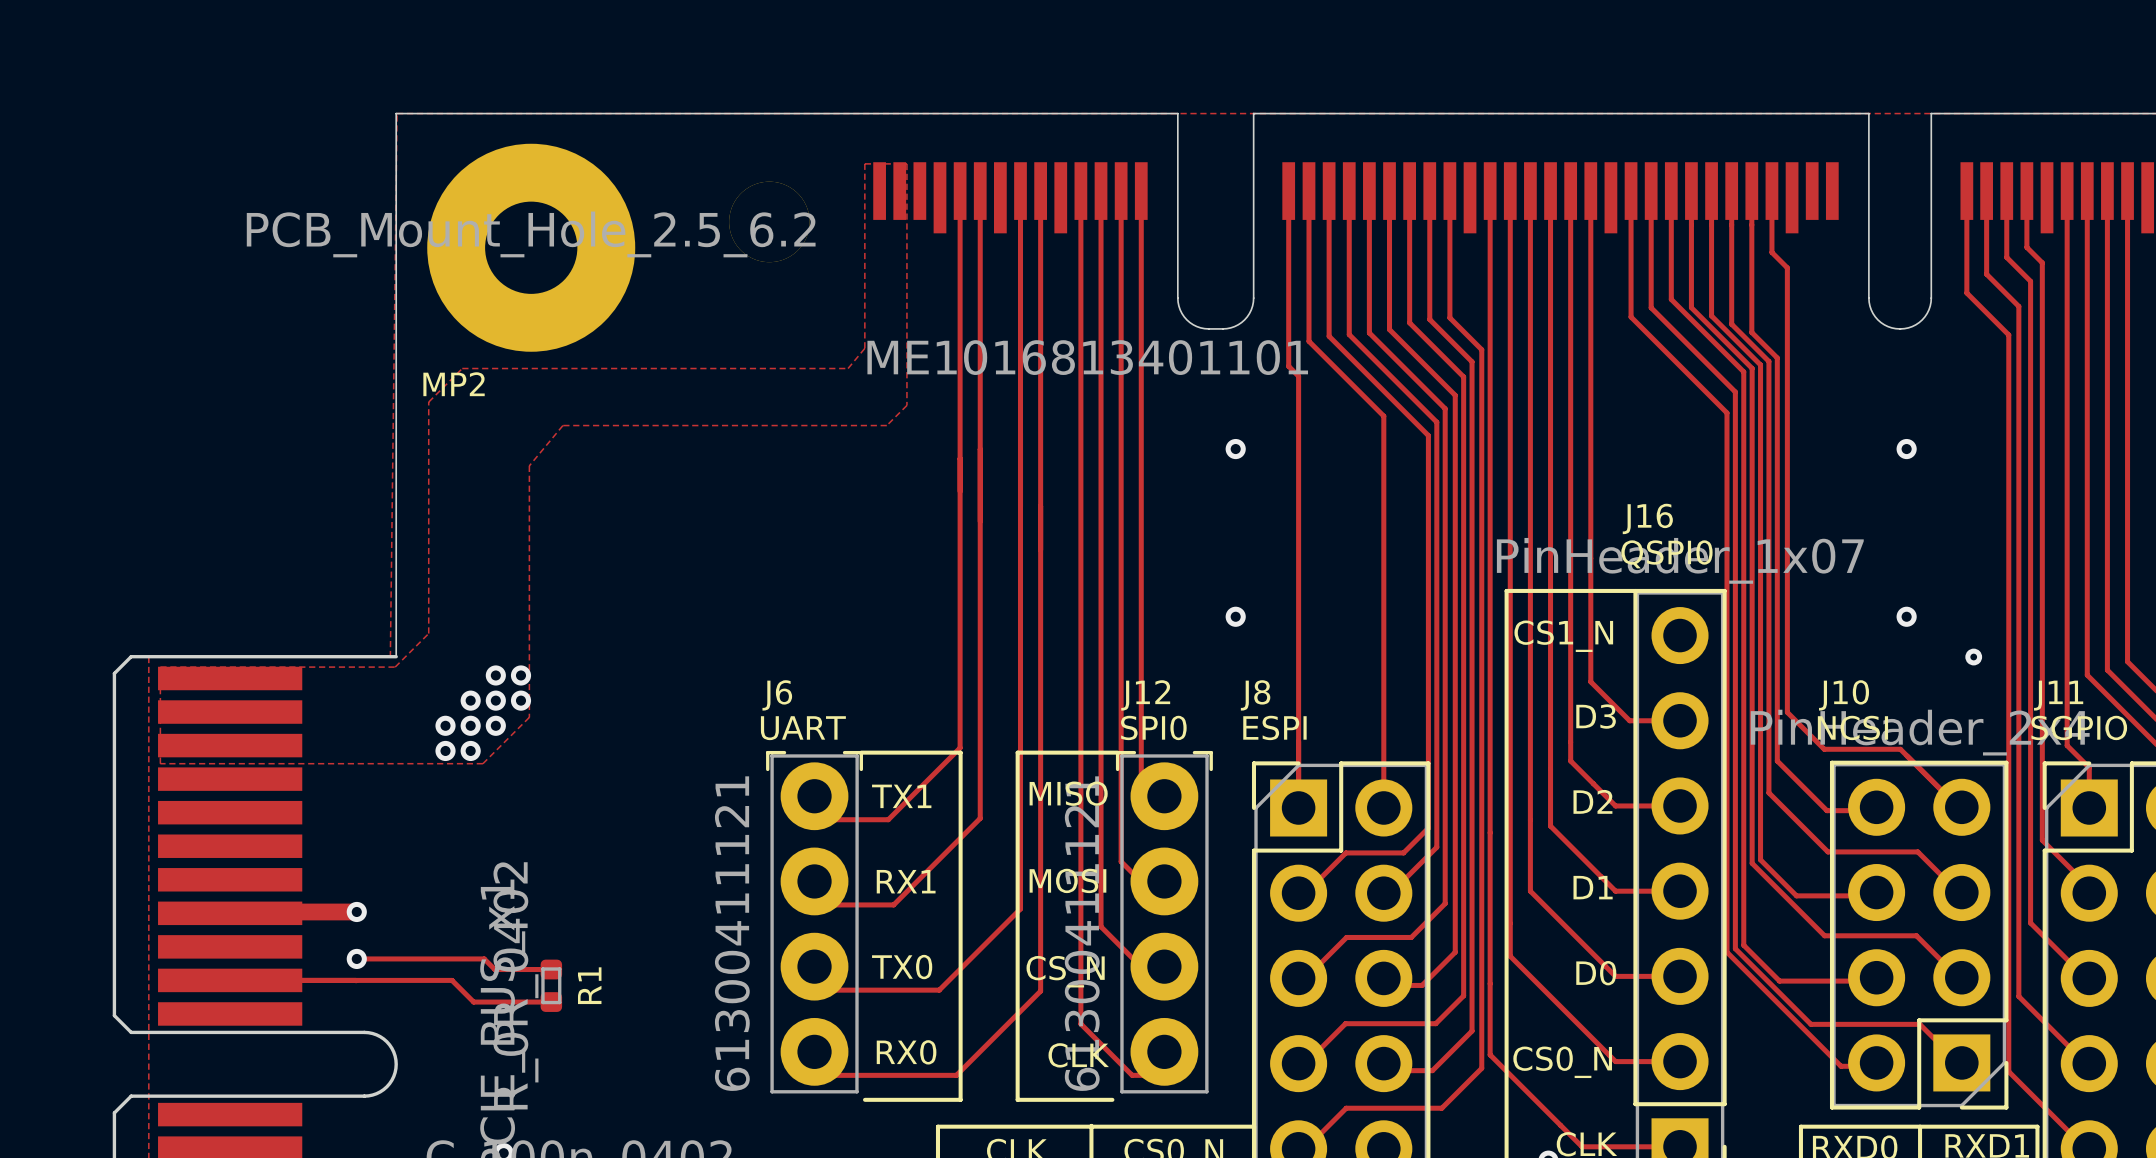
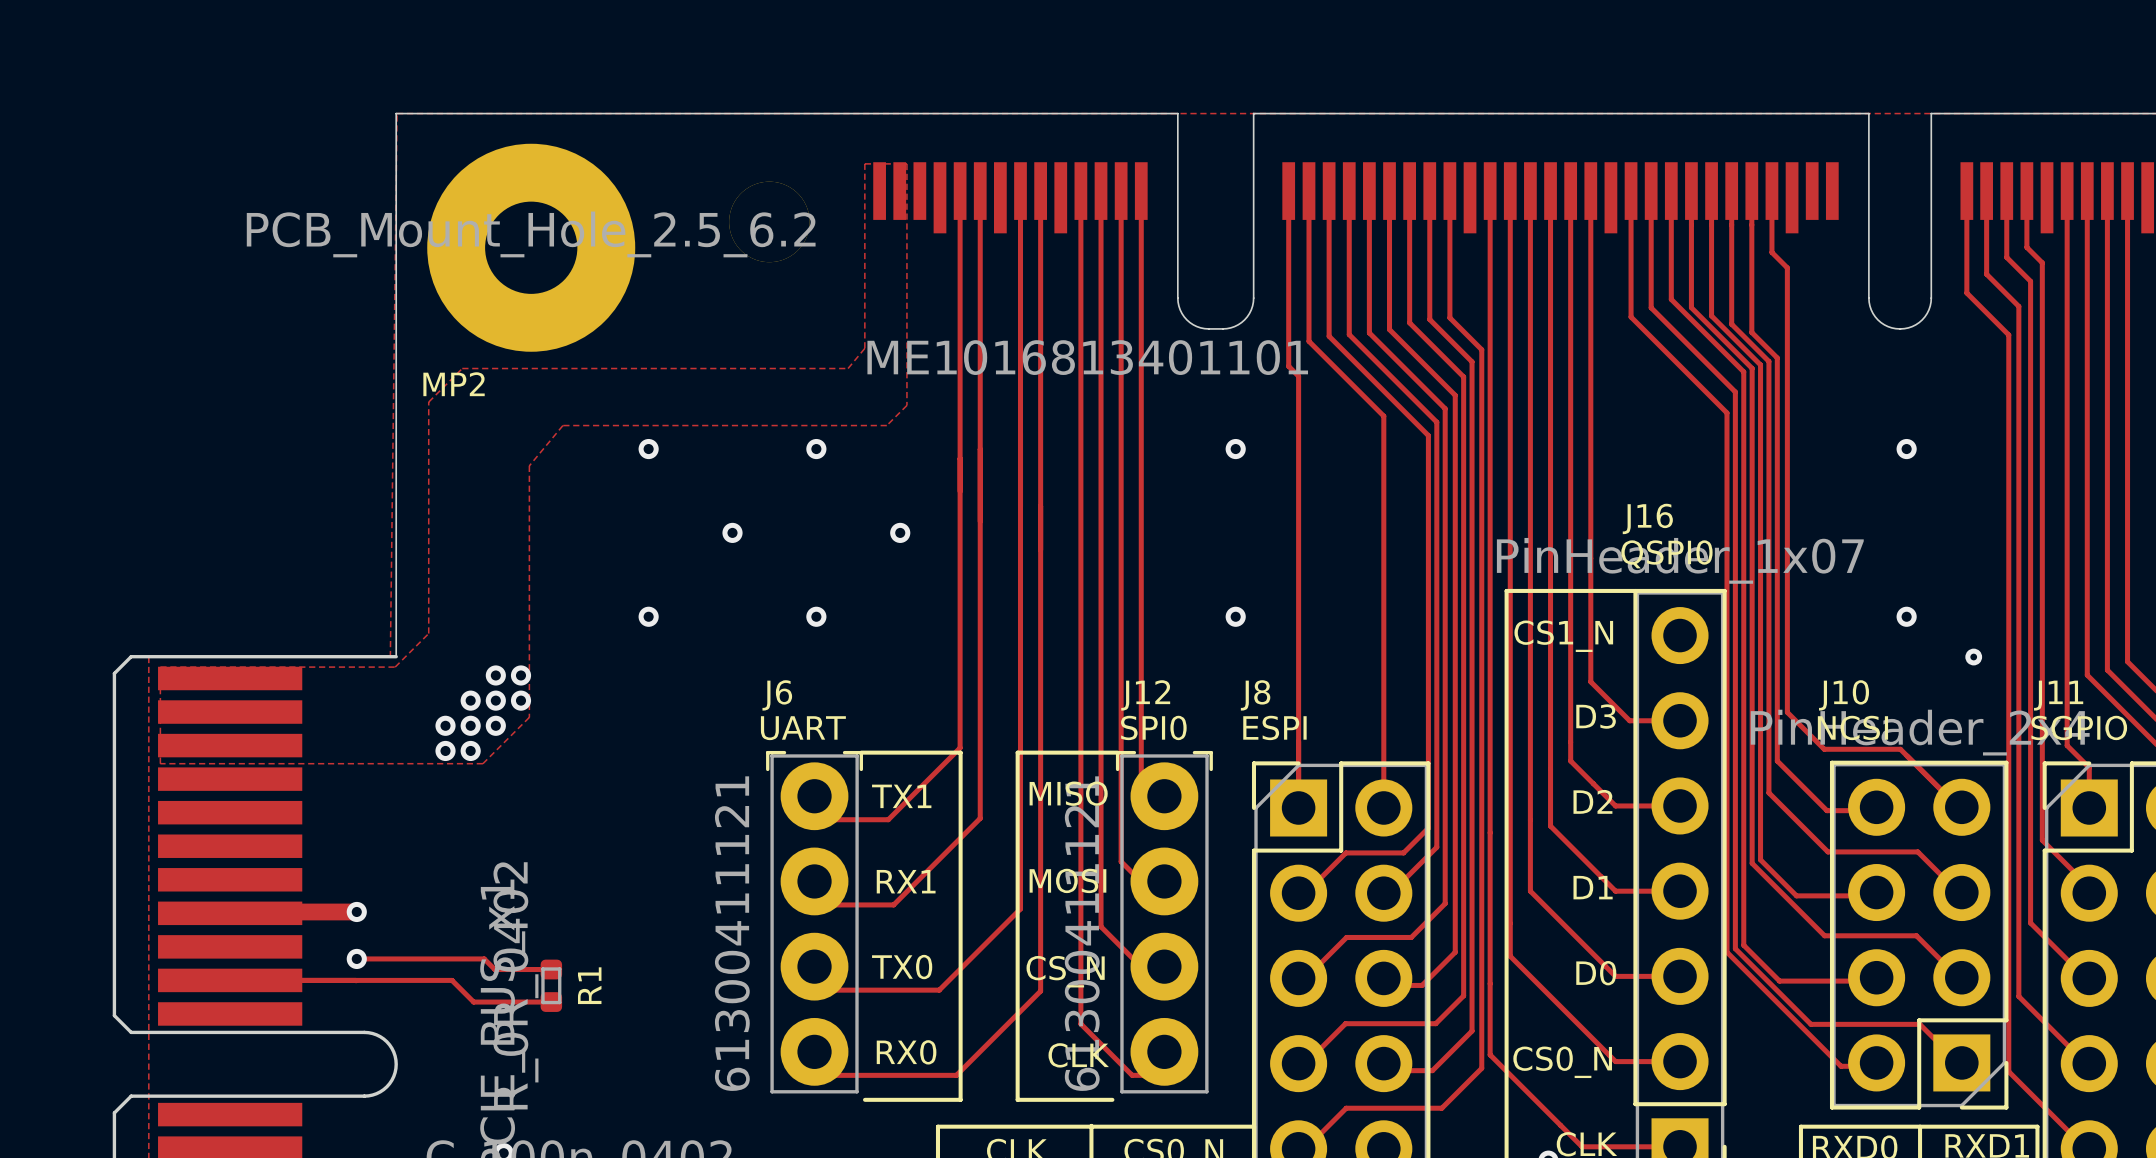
via: none -> (648, 449)
via: none -> (816, 449)
via: none -> (732, 532)
via: none -> (900, 532)
via: none -> (648, 616)
via: none -> (816, 616)

